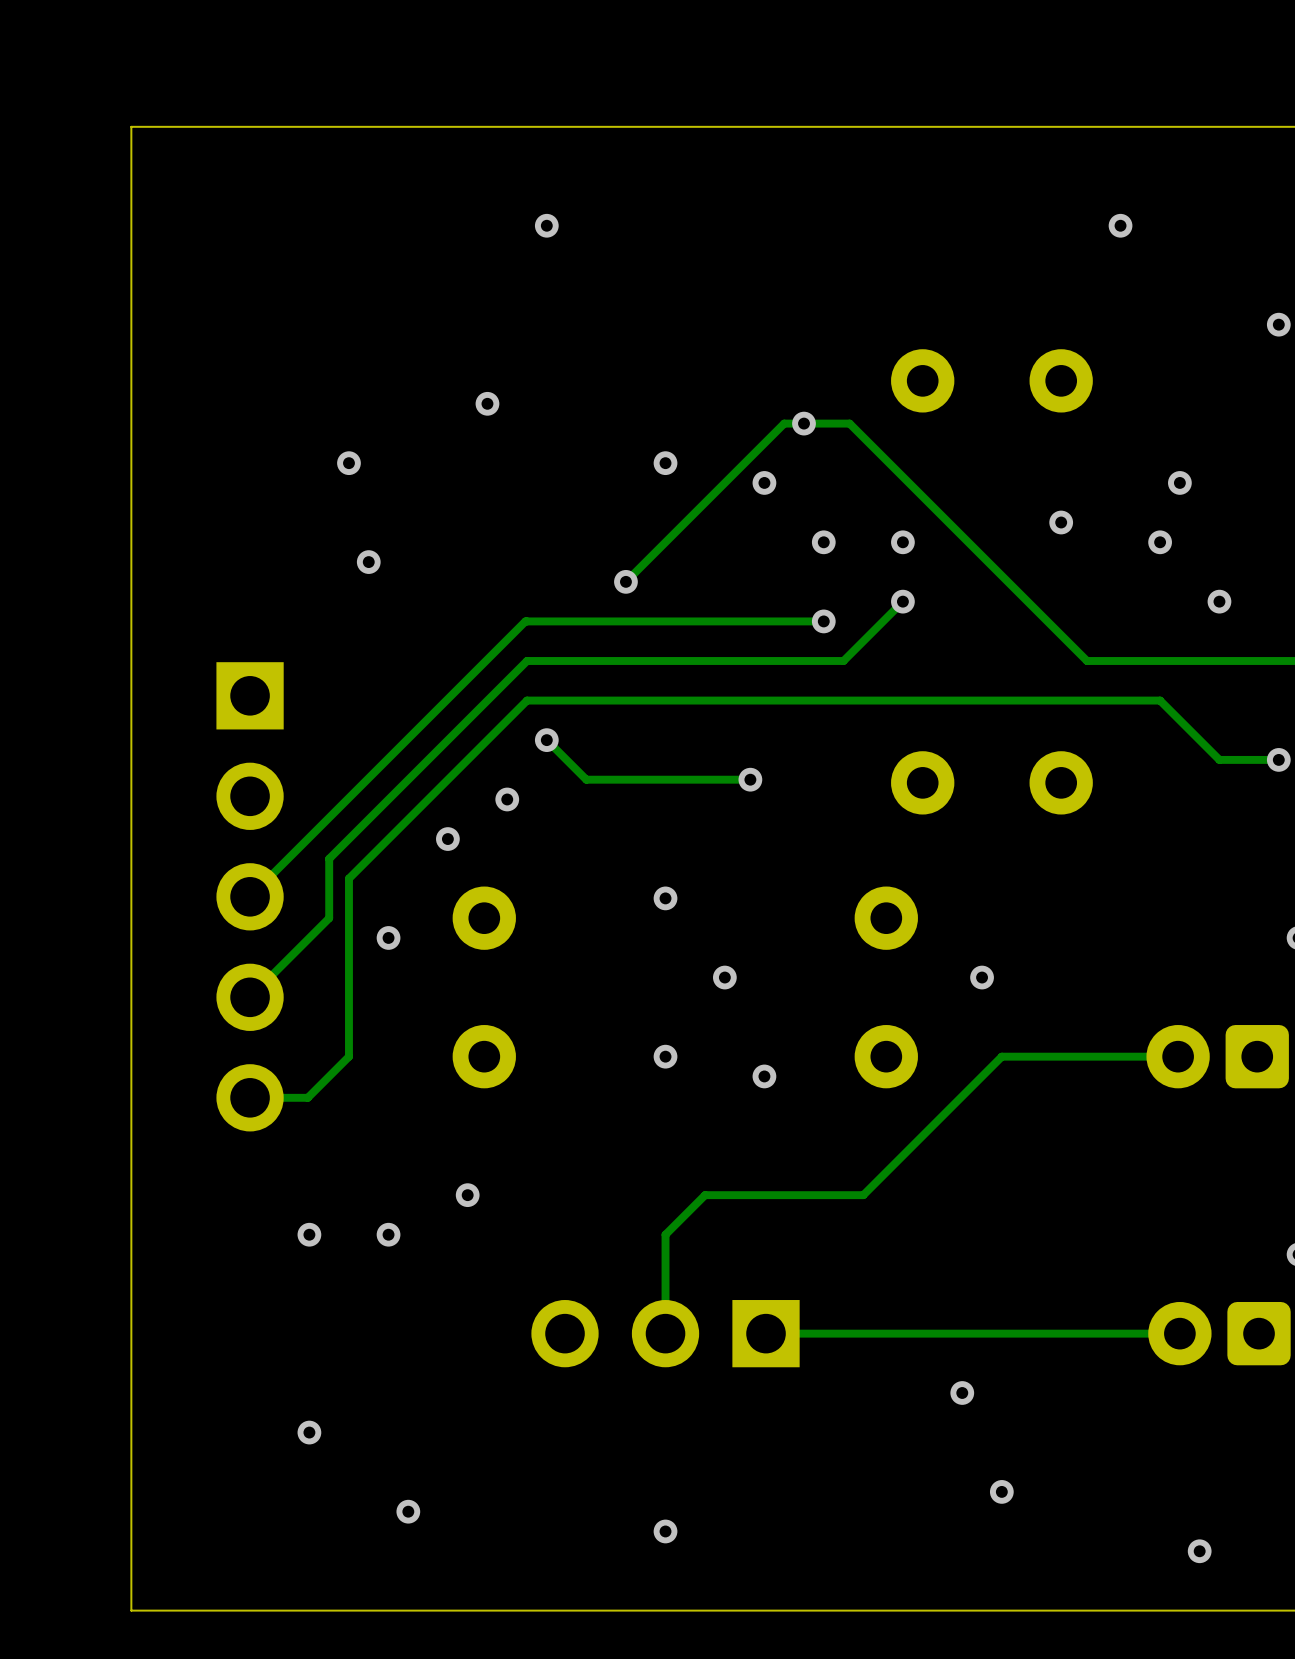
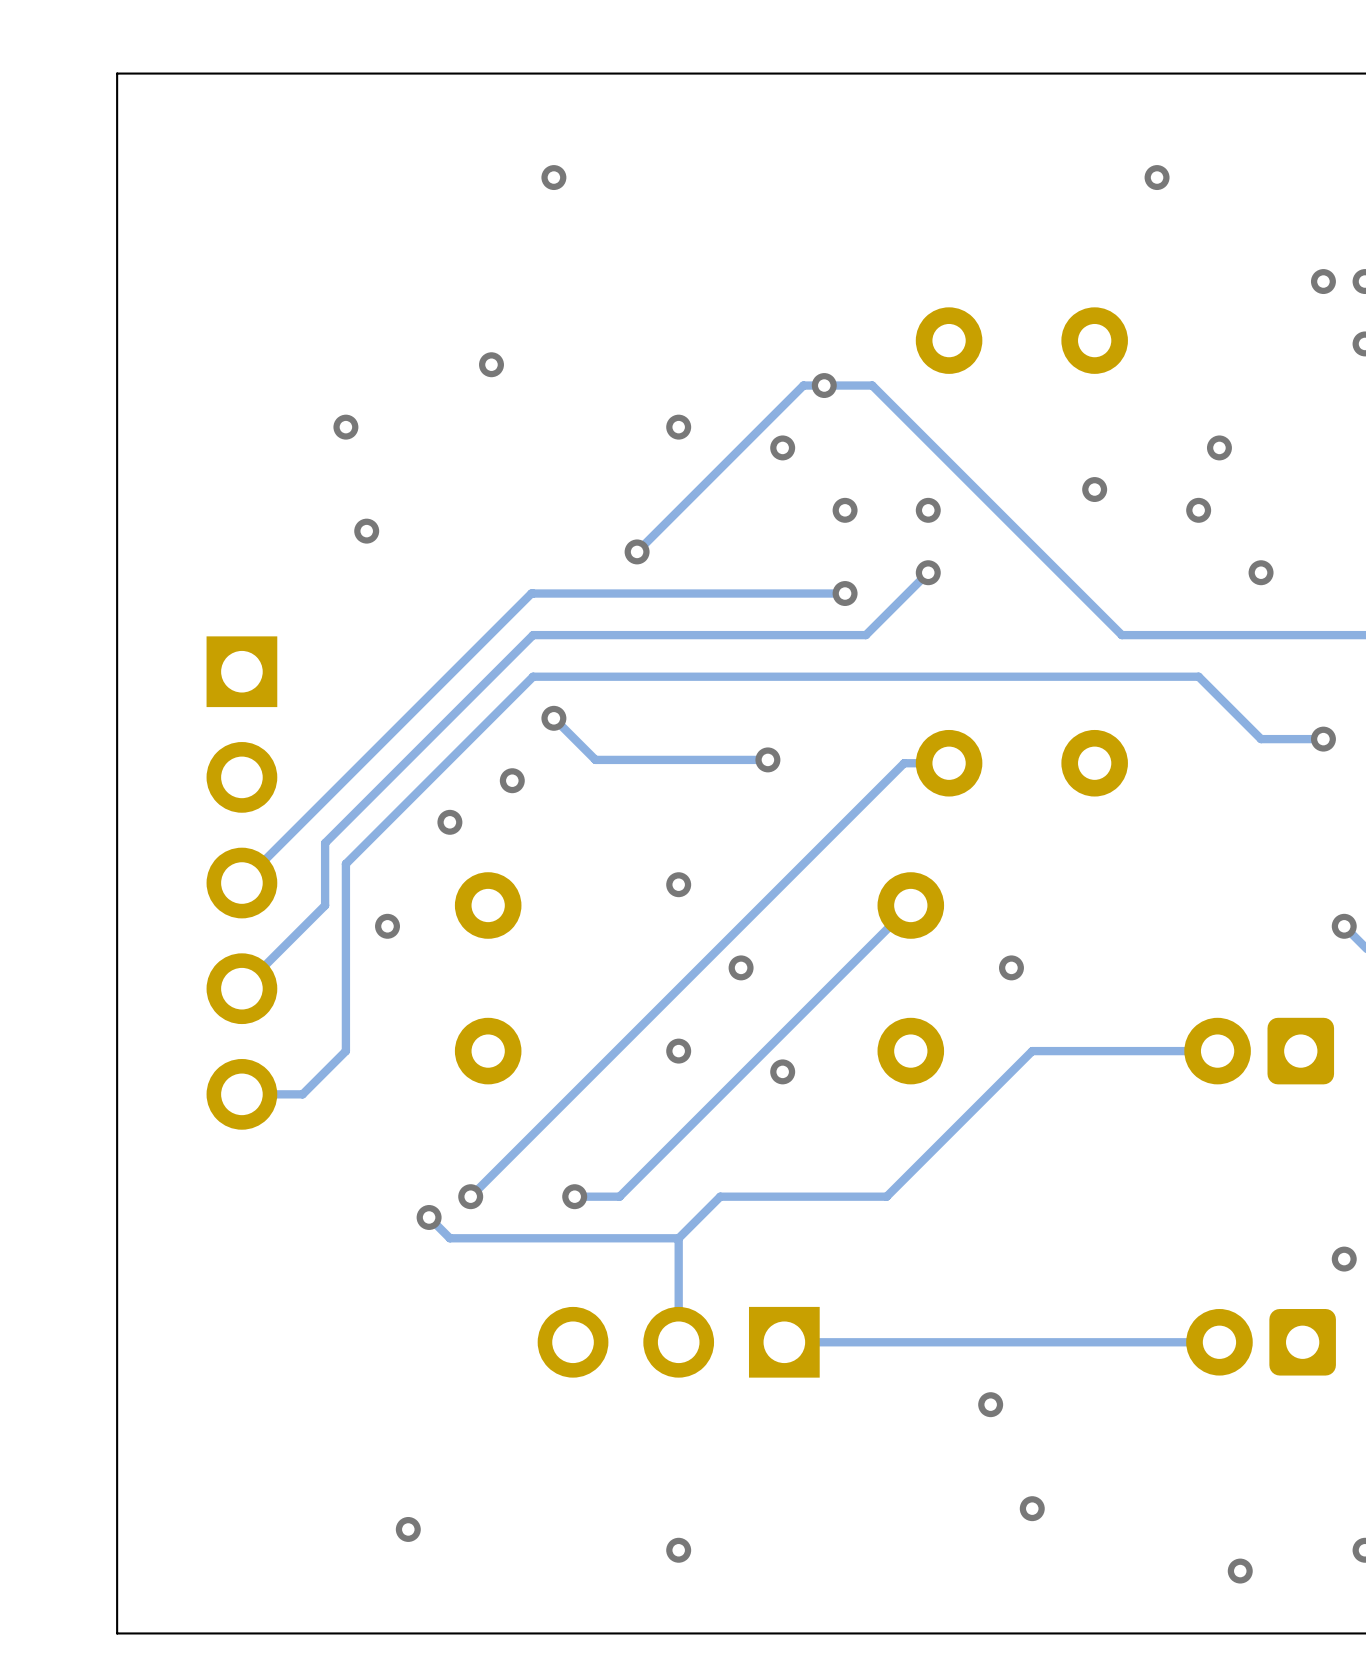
track: none -> (949, 763) (904, 763) (470, 1196)
track: none -> (910, 905) (619, 1196) (574, 1196)
via: none -> (574, 1196)
track: none -> (429, 1217) (449, 1238) (678, 1238)
via: (309, 1234) -> none
via position: (388, 1234) -> (429, 1217)
via: (309, 1432) -> none

